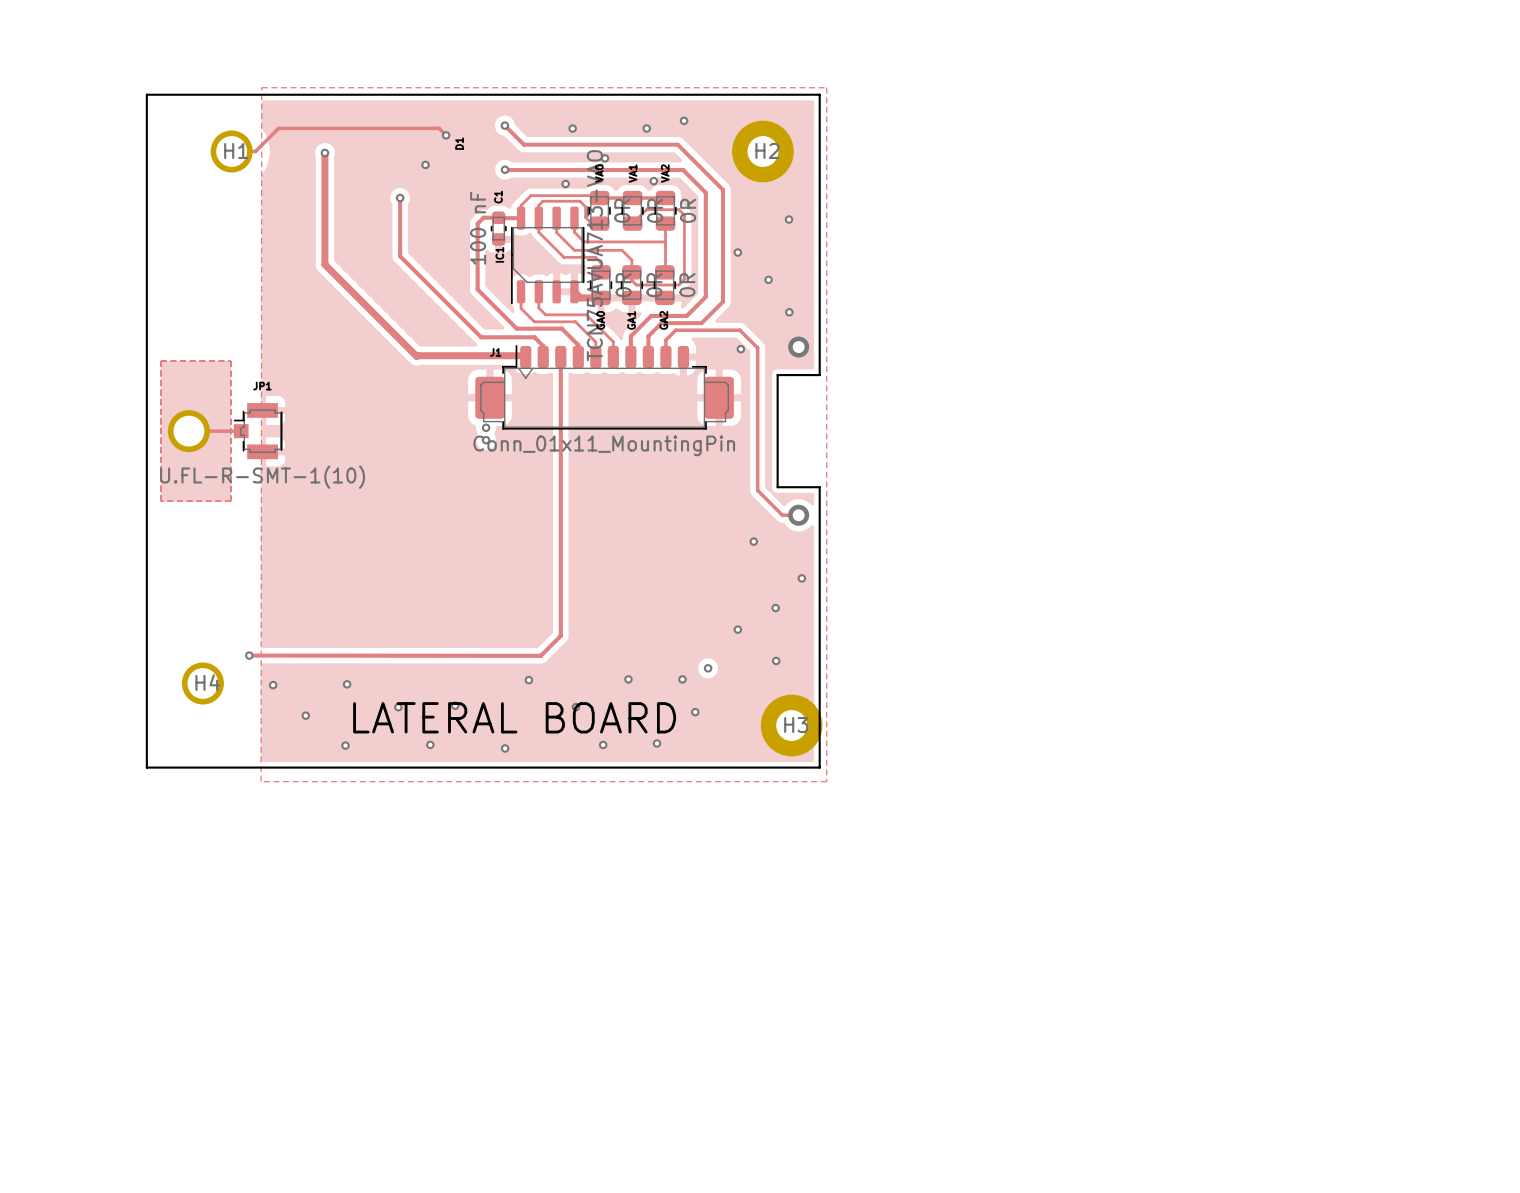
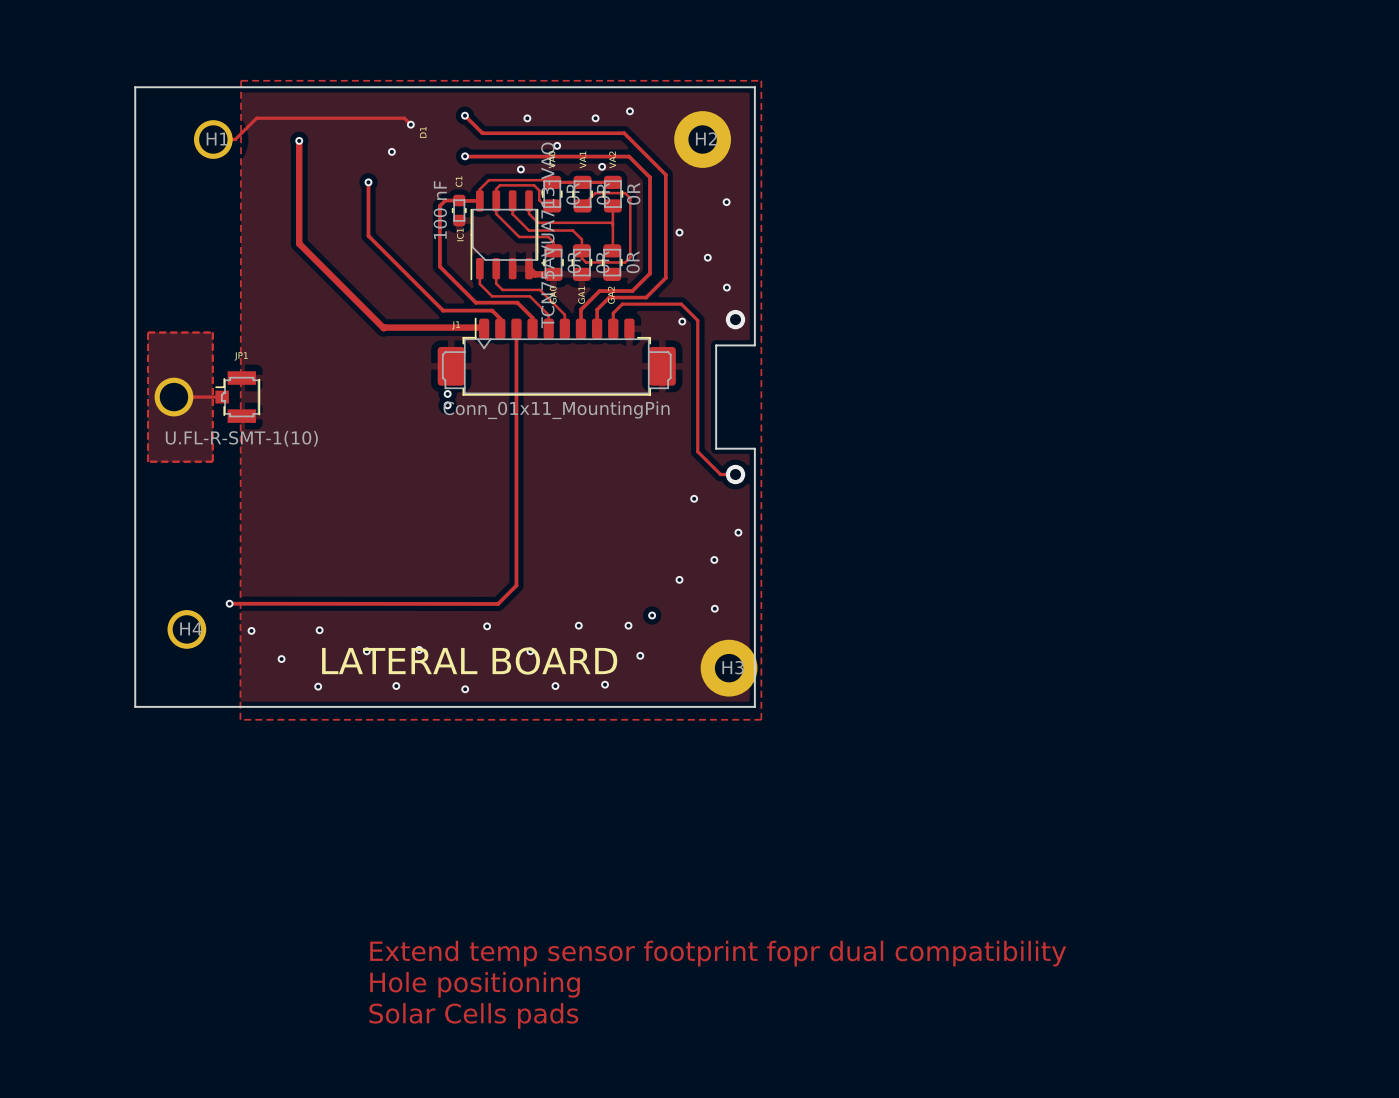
text: none -> Extend temp sensor footprint fopr dual compatibility (718, 953)
text: none -> Hole positioning (475, 984)
text: none -> Solar Cells pads (473, 1015)

